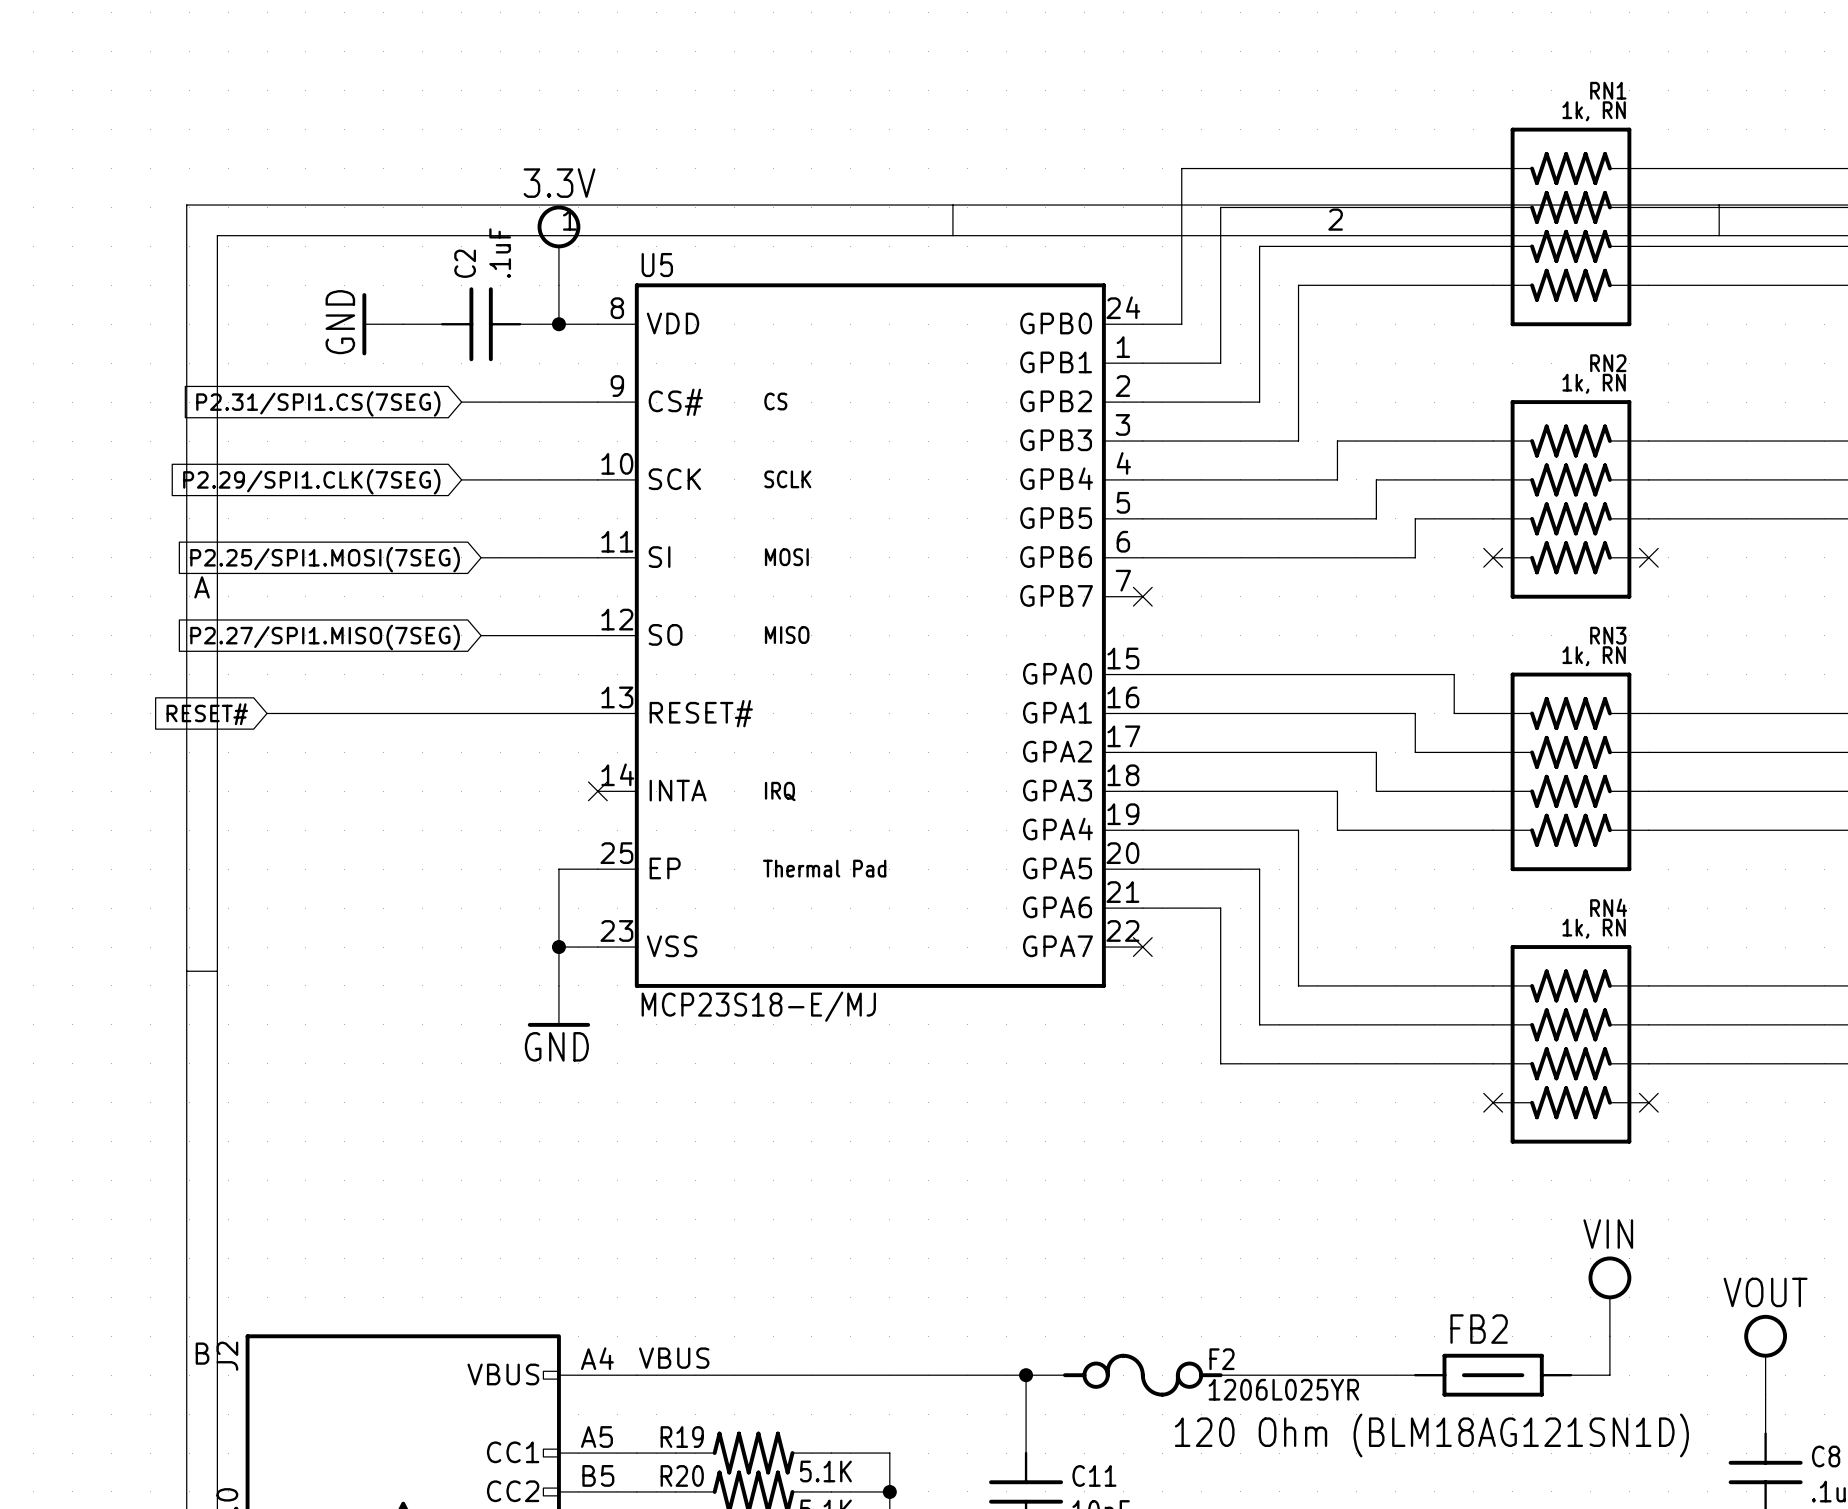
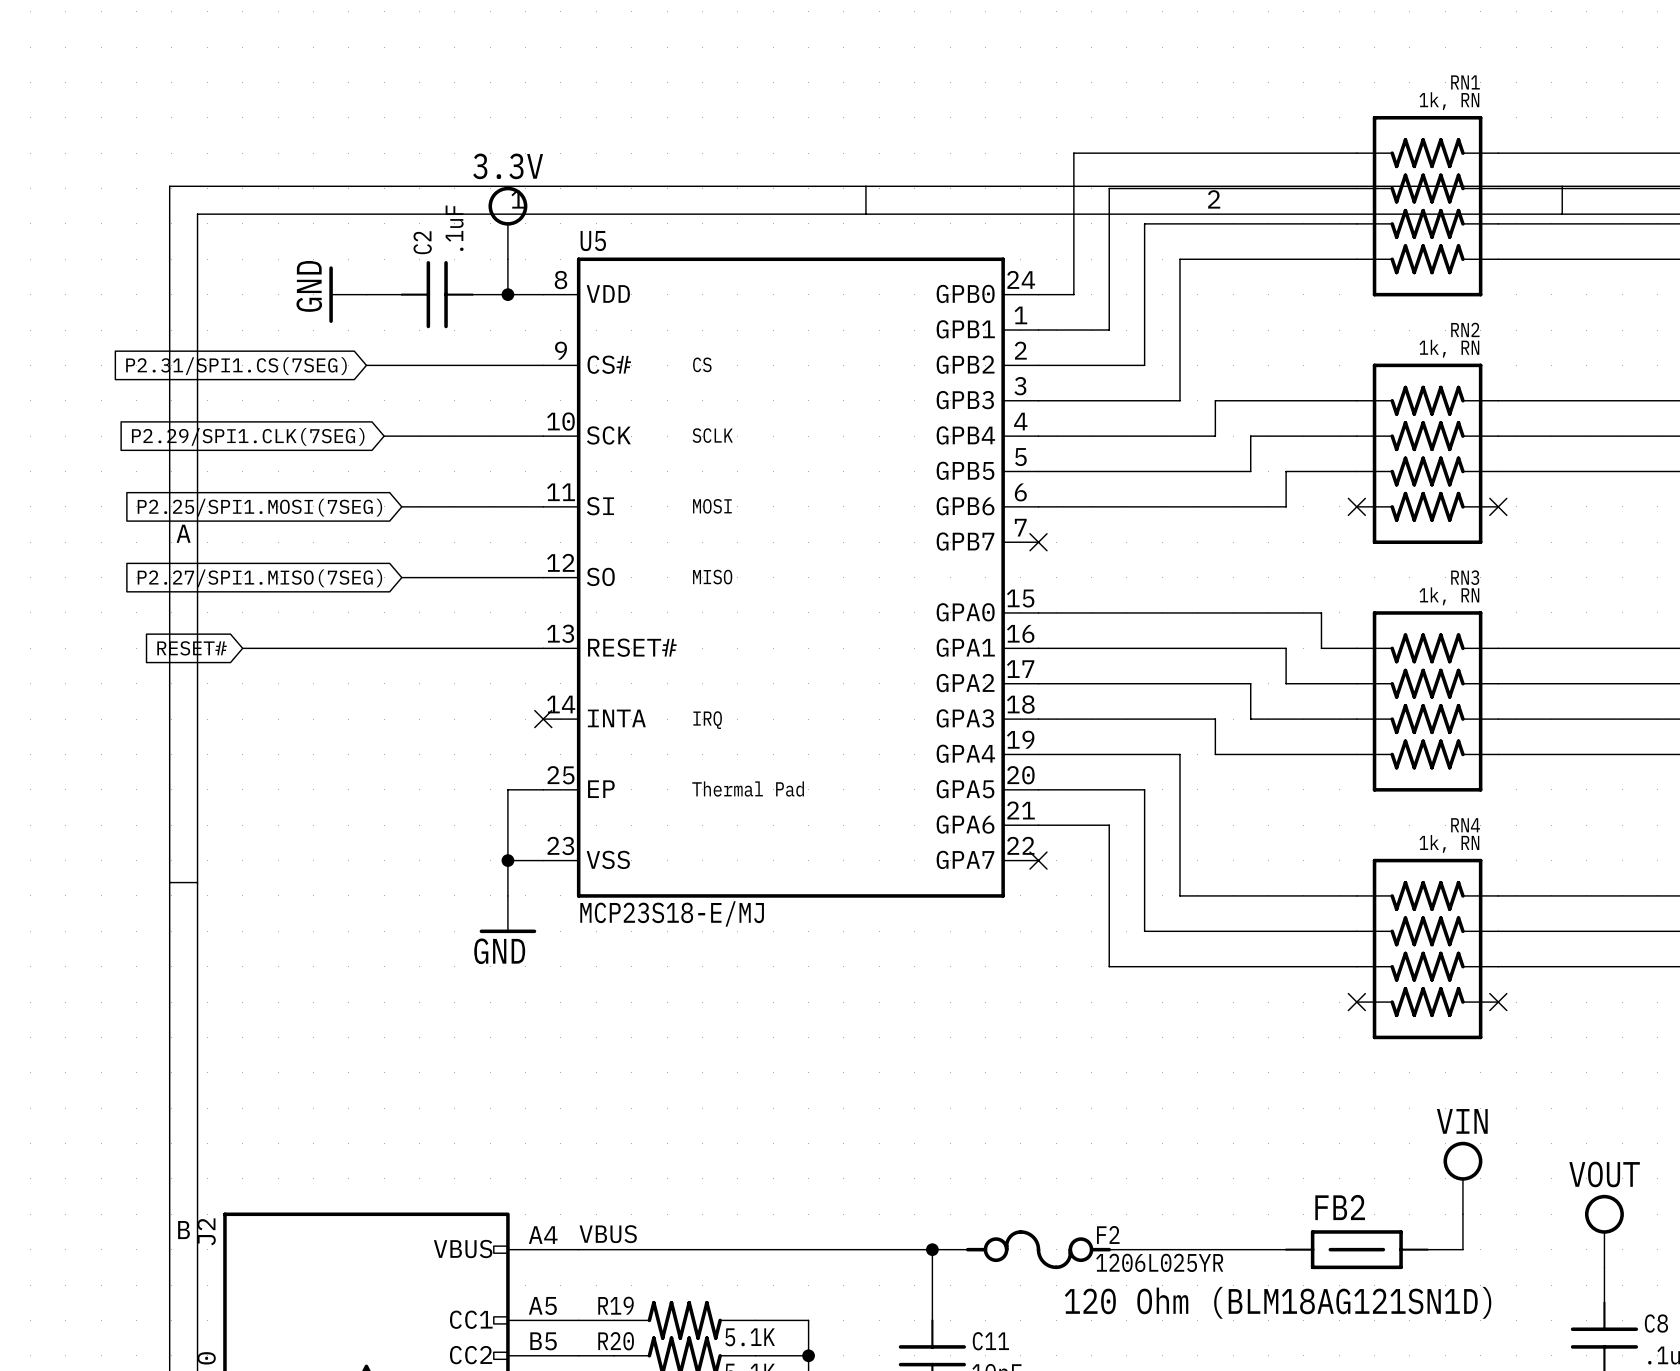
wire: none -> (366, 365) (419, 365)
global label position: P2.31/SPI1.CS(7SEG) (318, 403) -> P2.31/SPI1.CS(7SEG) (236, 366)
wire: none -> (384, 436) (419, 436)
global label position: P2.29/SPI1.CLK(7SEG) (311, 481) -> P2.29/SPI1.CLK(7SEG) (248, 436)
wire: none -> (401, 506) (437, 506)
global label position: P2.25/SPI1.MOSI(7SEG) (325, 559) -> P2.25/SPI1.MOSI(7SEG) (259, 507)
wire: none -> (401, 577) (437, 577)
global label position: P2.27/SPI1.MISO(7SEG) (325, 637) -> P2.27/SPI1.MISO(7SEG) (259, 578)

